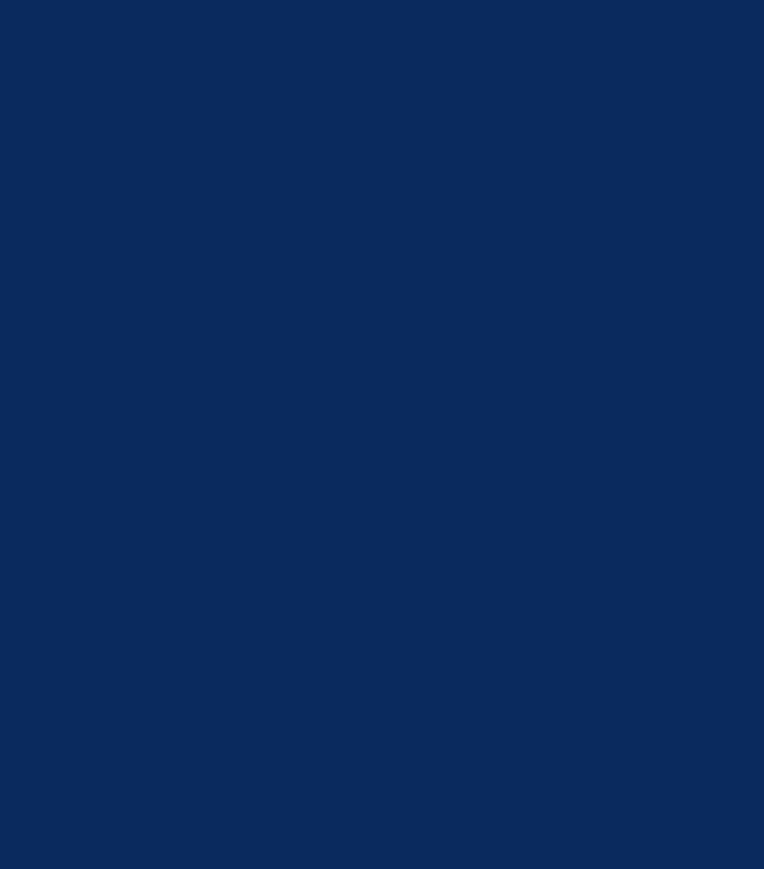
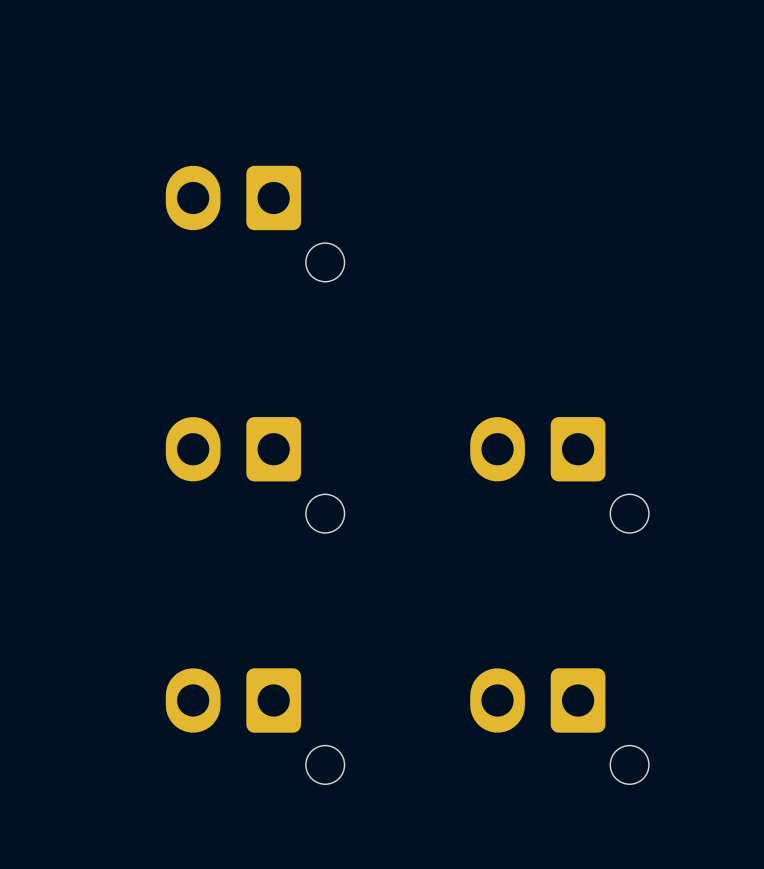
part: none -> (255, 223)
part: none -> (255, 475)
part: none -> (559, 475)
part: none -> (255, 726)
part: none -> (559, 726)

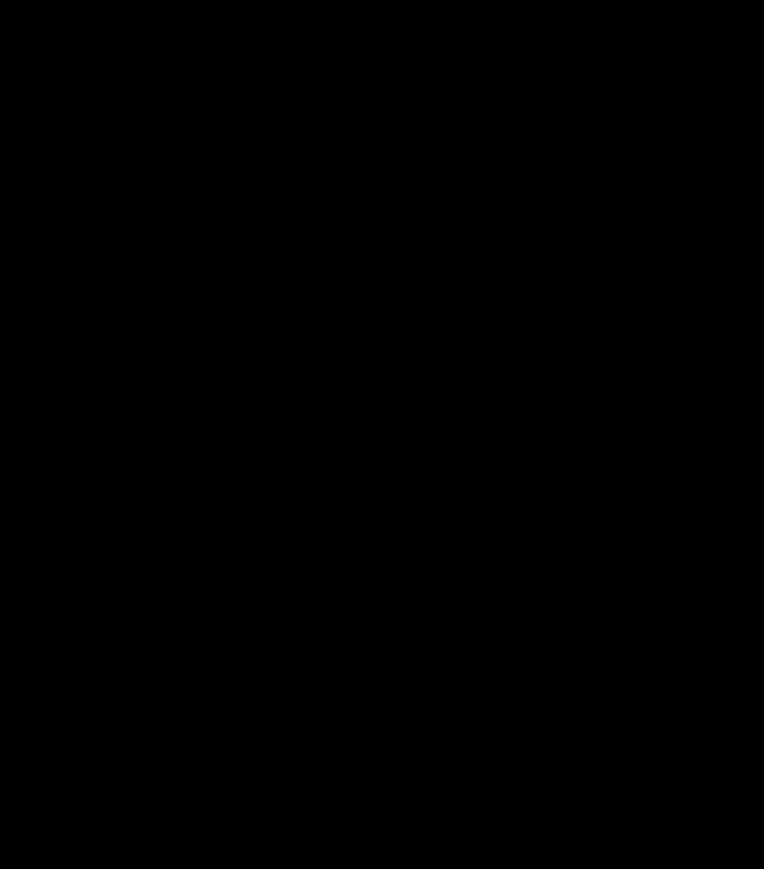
part: (255, 223) -> none
part: (255, 475) -> none
part: (559, 475) -> none
part: (255, 726) -> none
part: (559, 726) -> none

